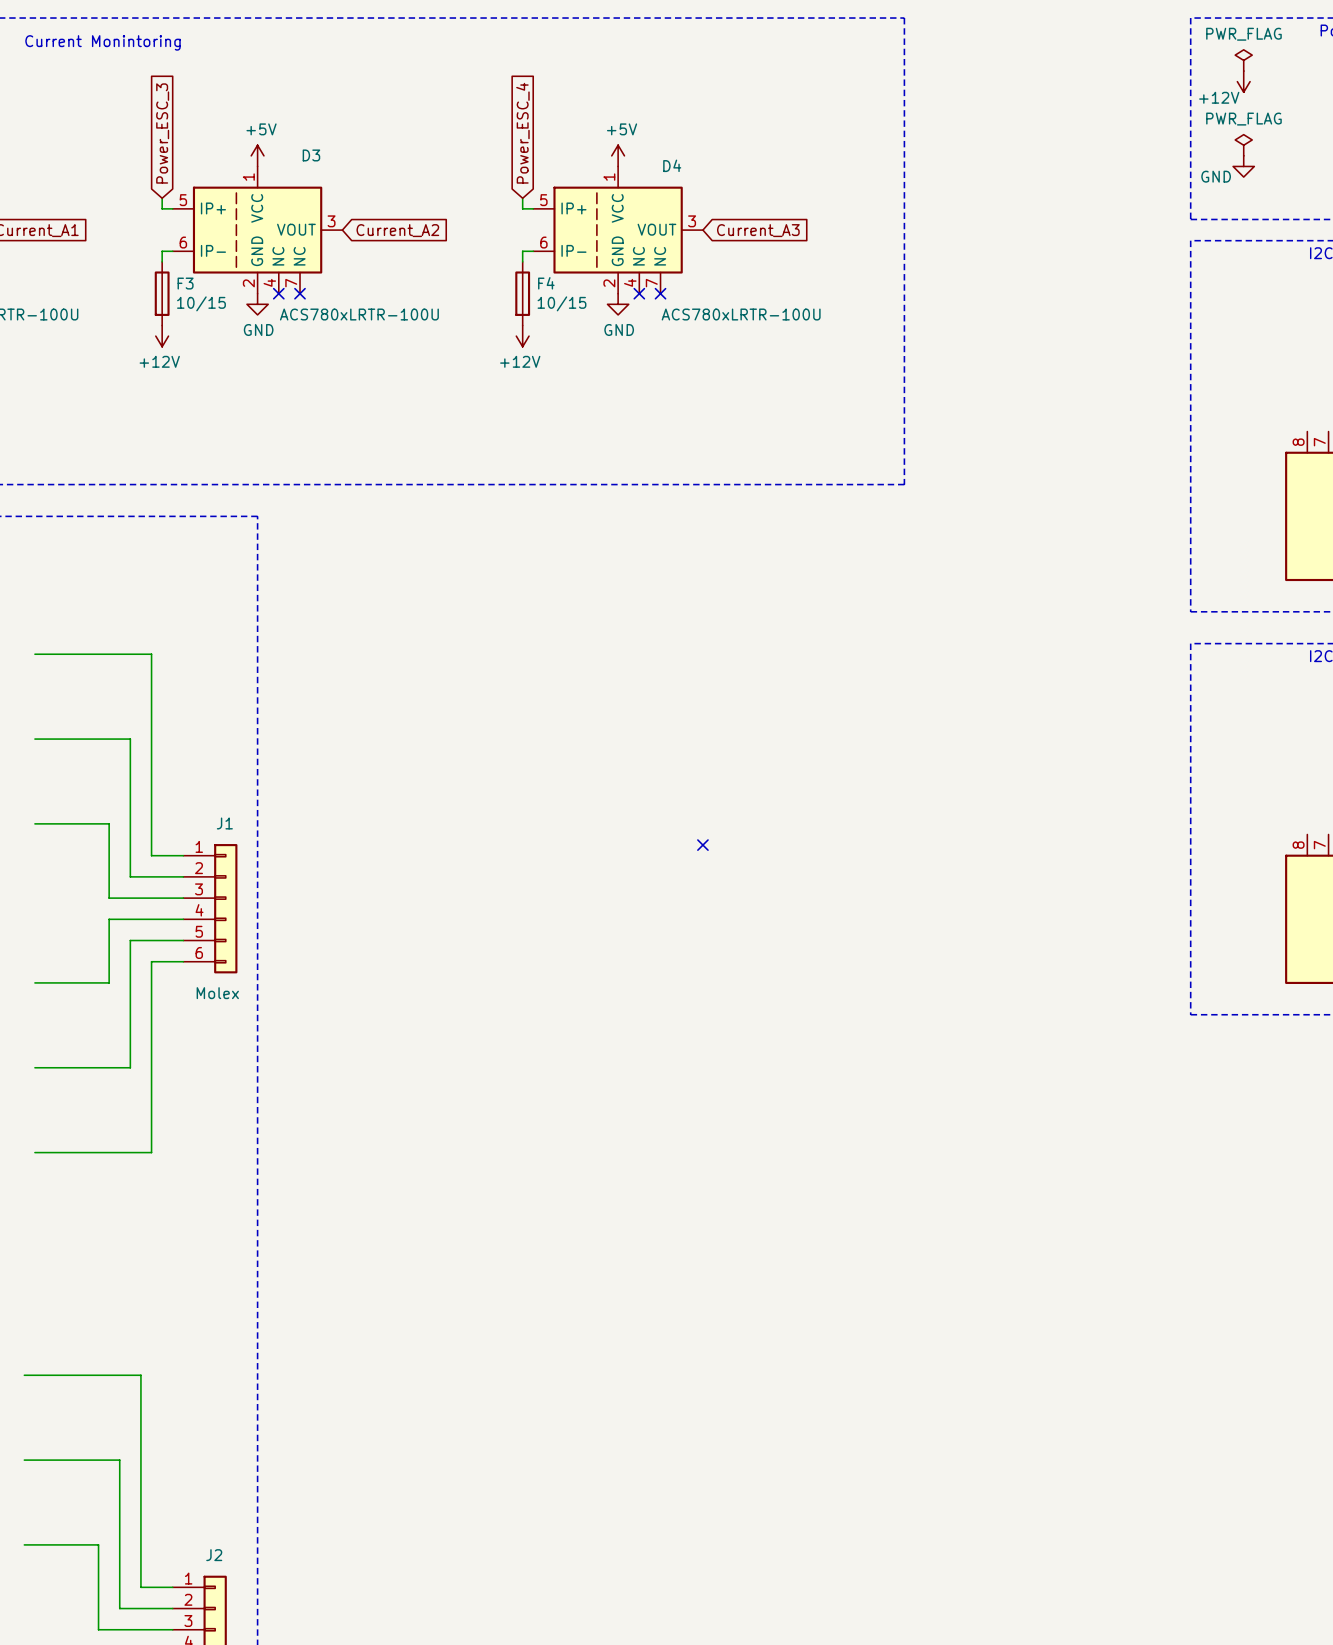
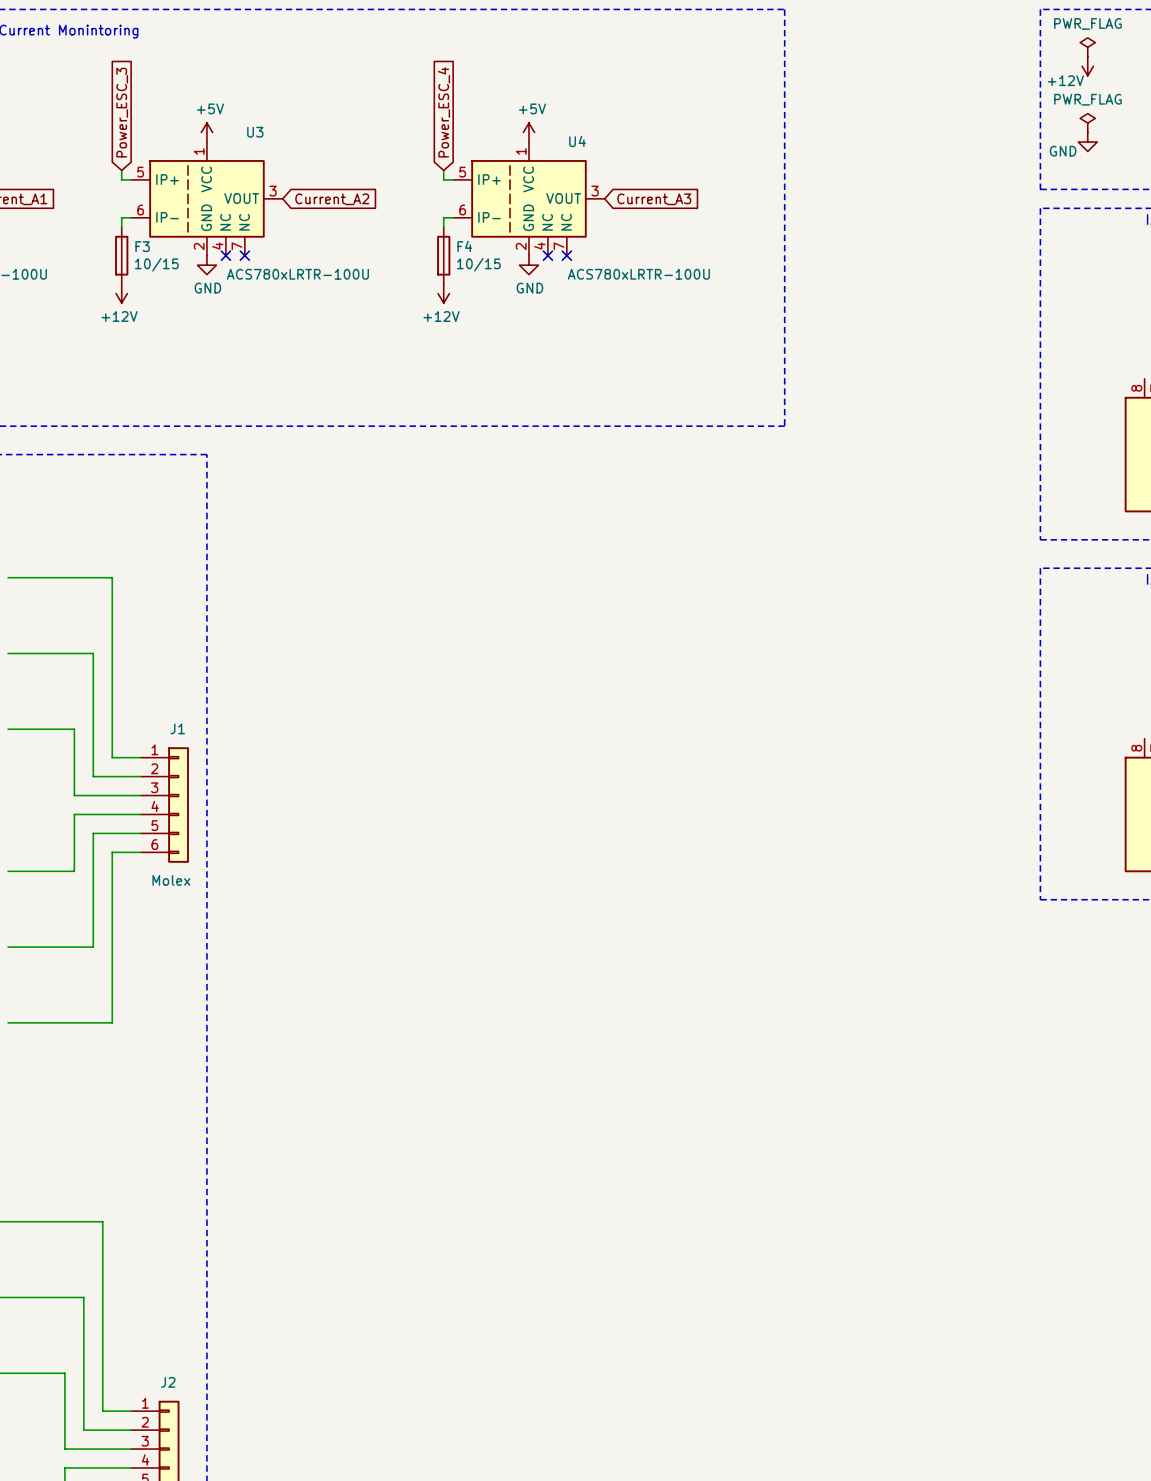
D3 name: D3 (311, 155) -> U3 (255, 132)
D4 name: D4 (672, 165) -> U4 (577, 141)
no-connect mark: (702, 845) -> none

